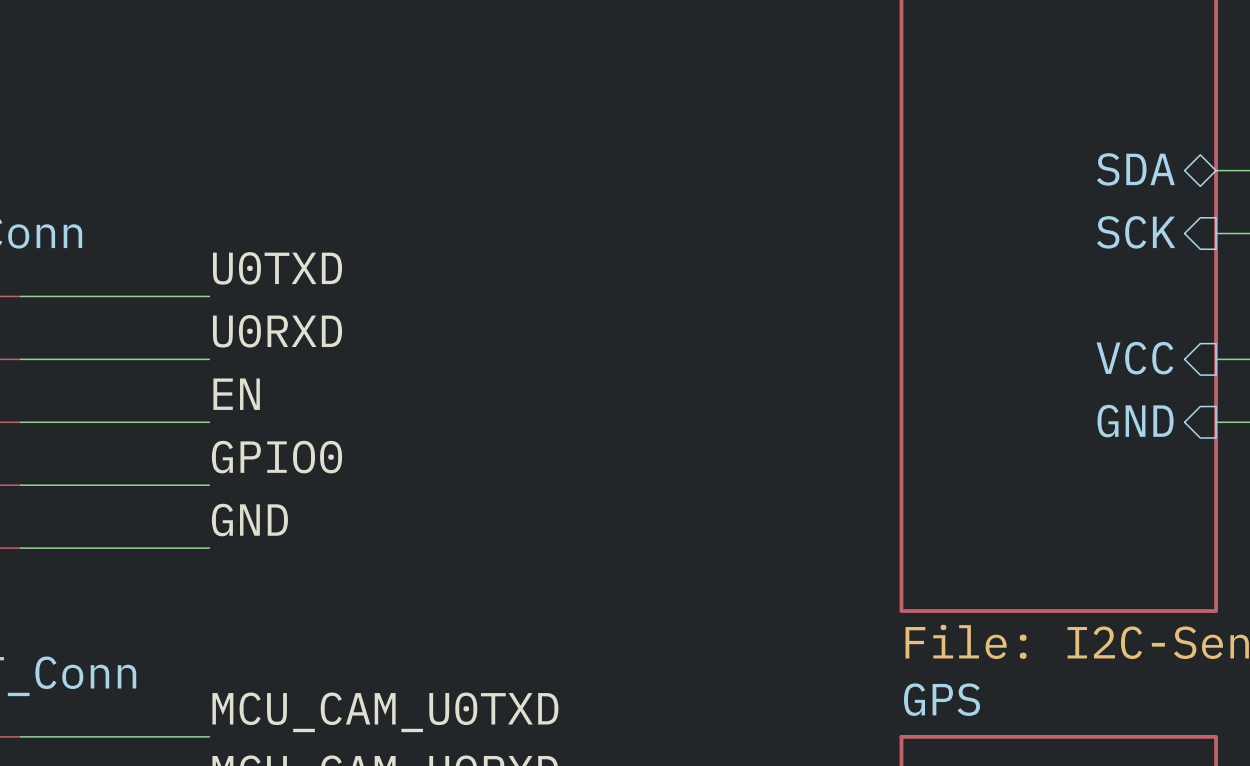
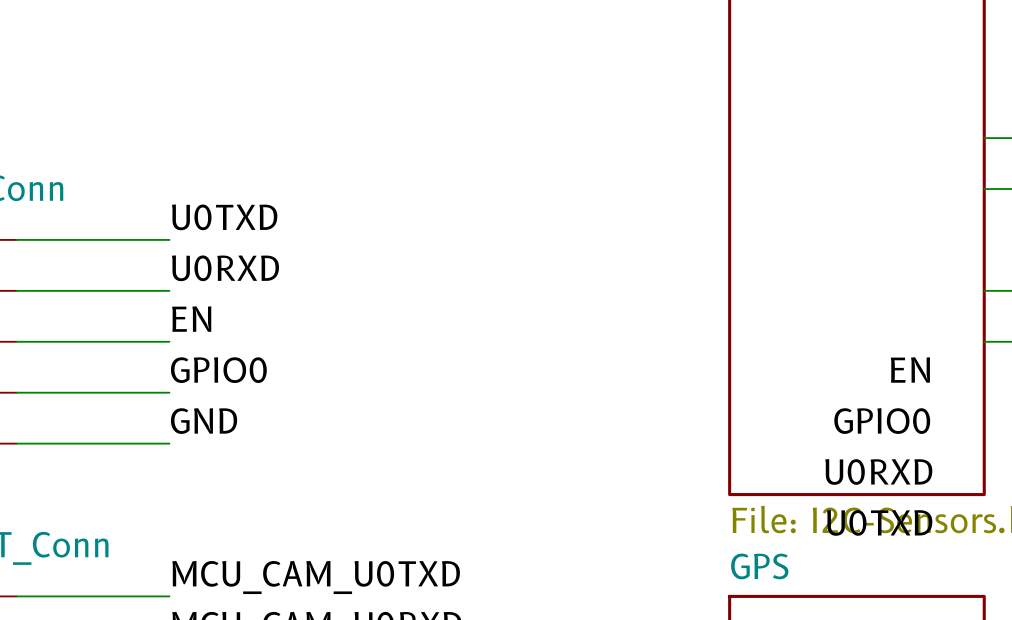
sheet pin: SDA (1135, 169) -> none
sheet pin: SCK (1136, 232) -> none
sheet pin: VCC (1134, 358) -> none
sheet pin: GND (1135, 421) -> none
label: none -> EN (910, 369)
label: none -> GPIO0 (882, 421)
label: none -> U0RXD (878, 471)
label: none -> U0TXD (879, 522)

